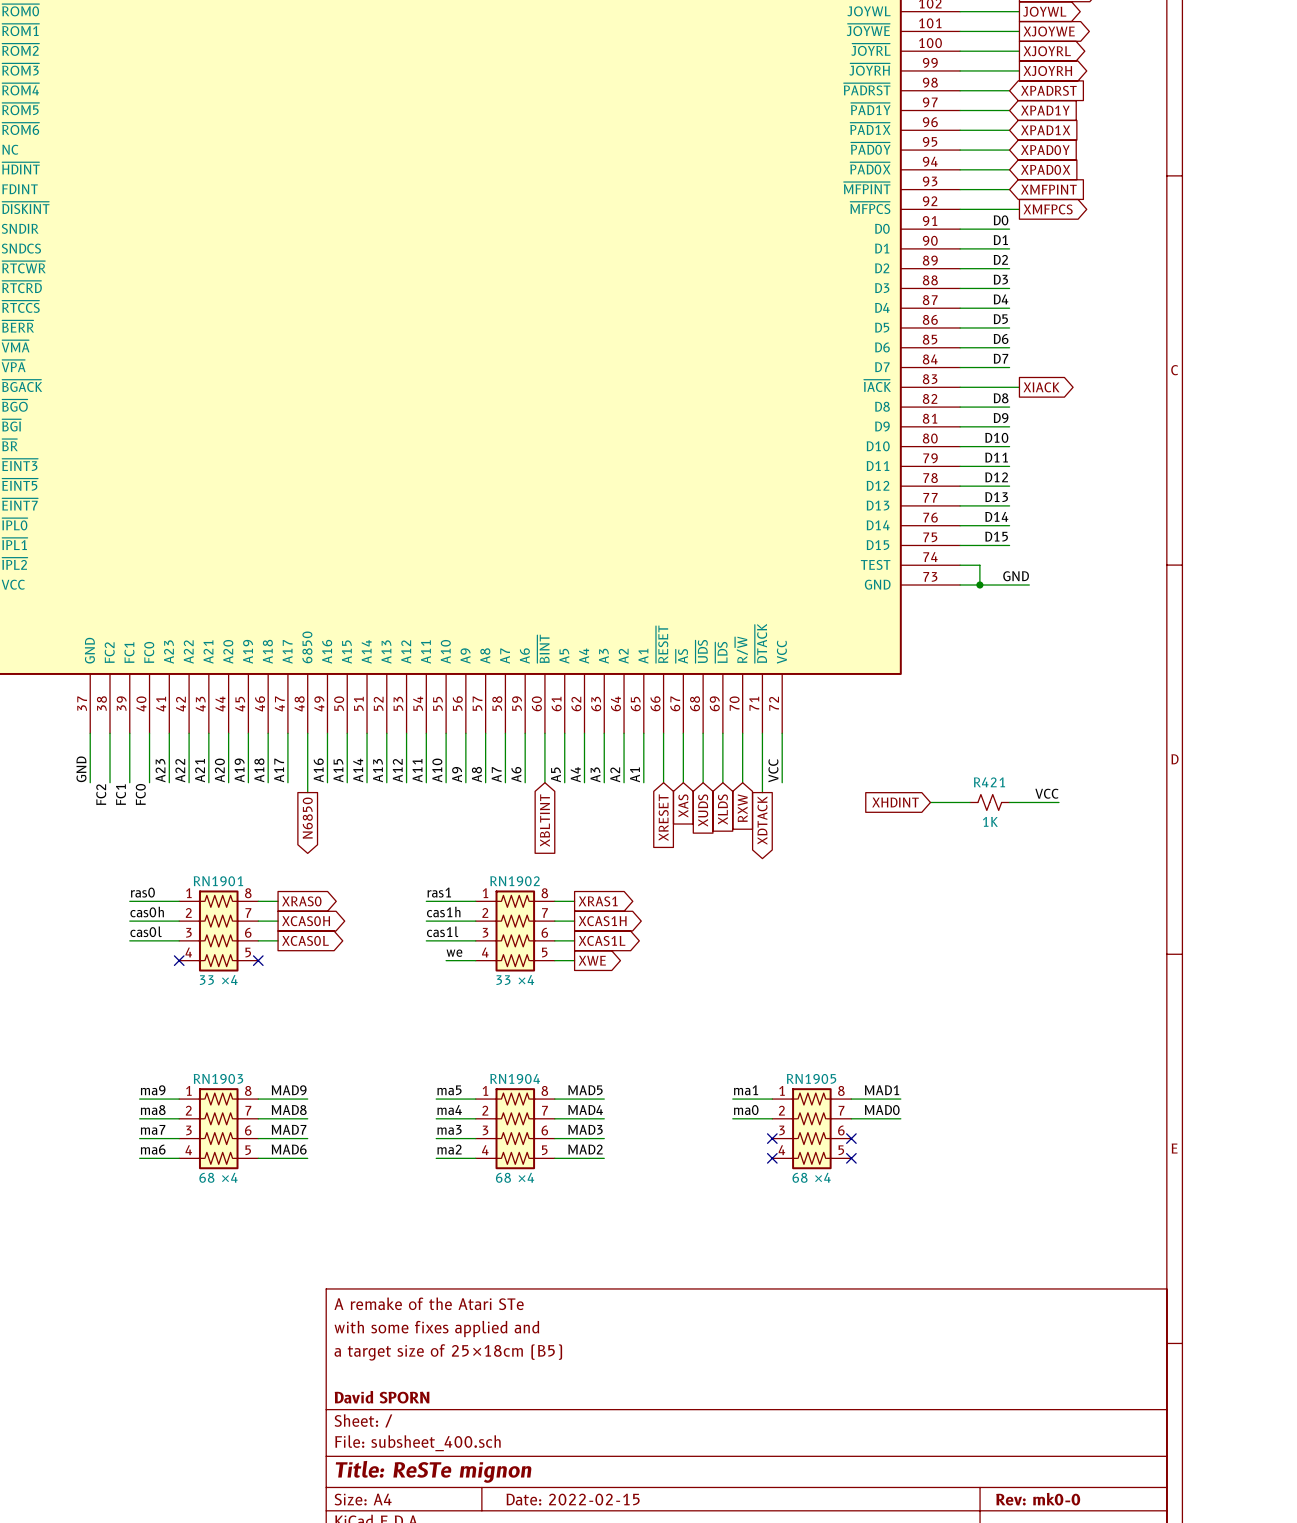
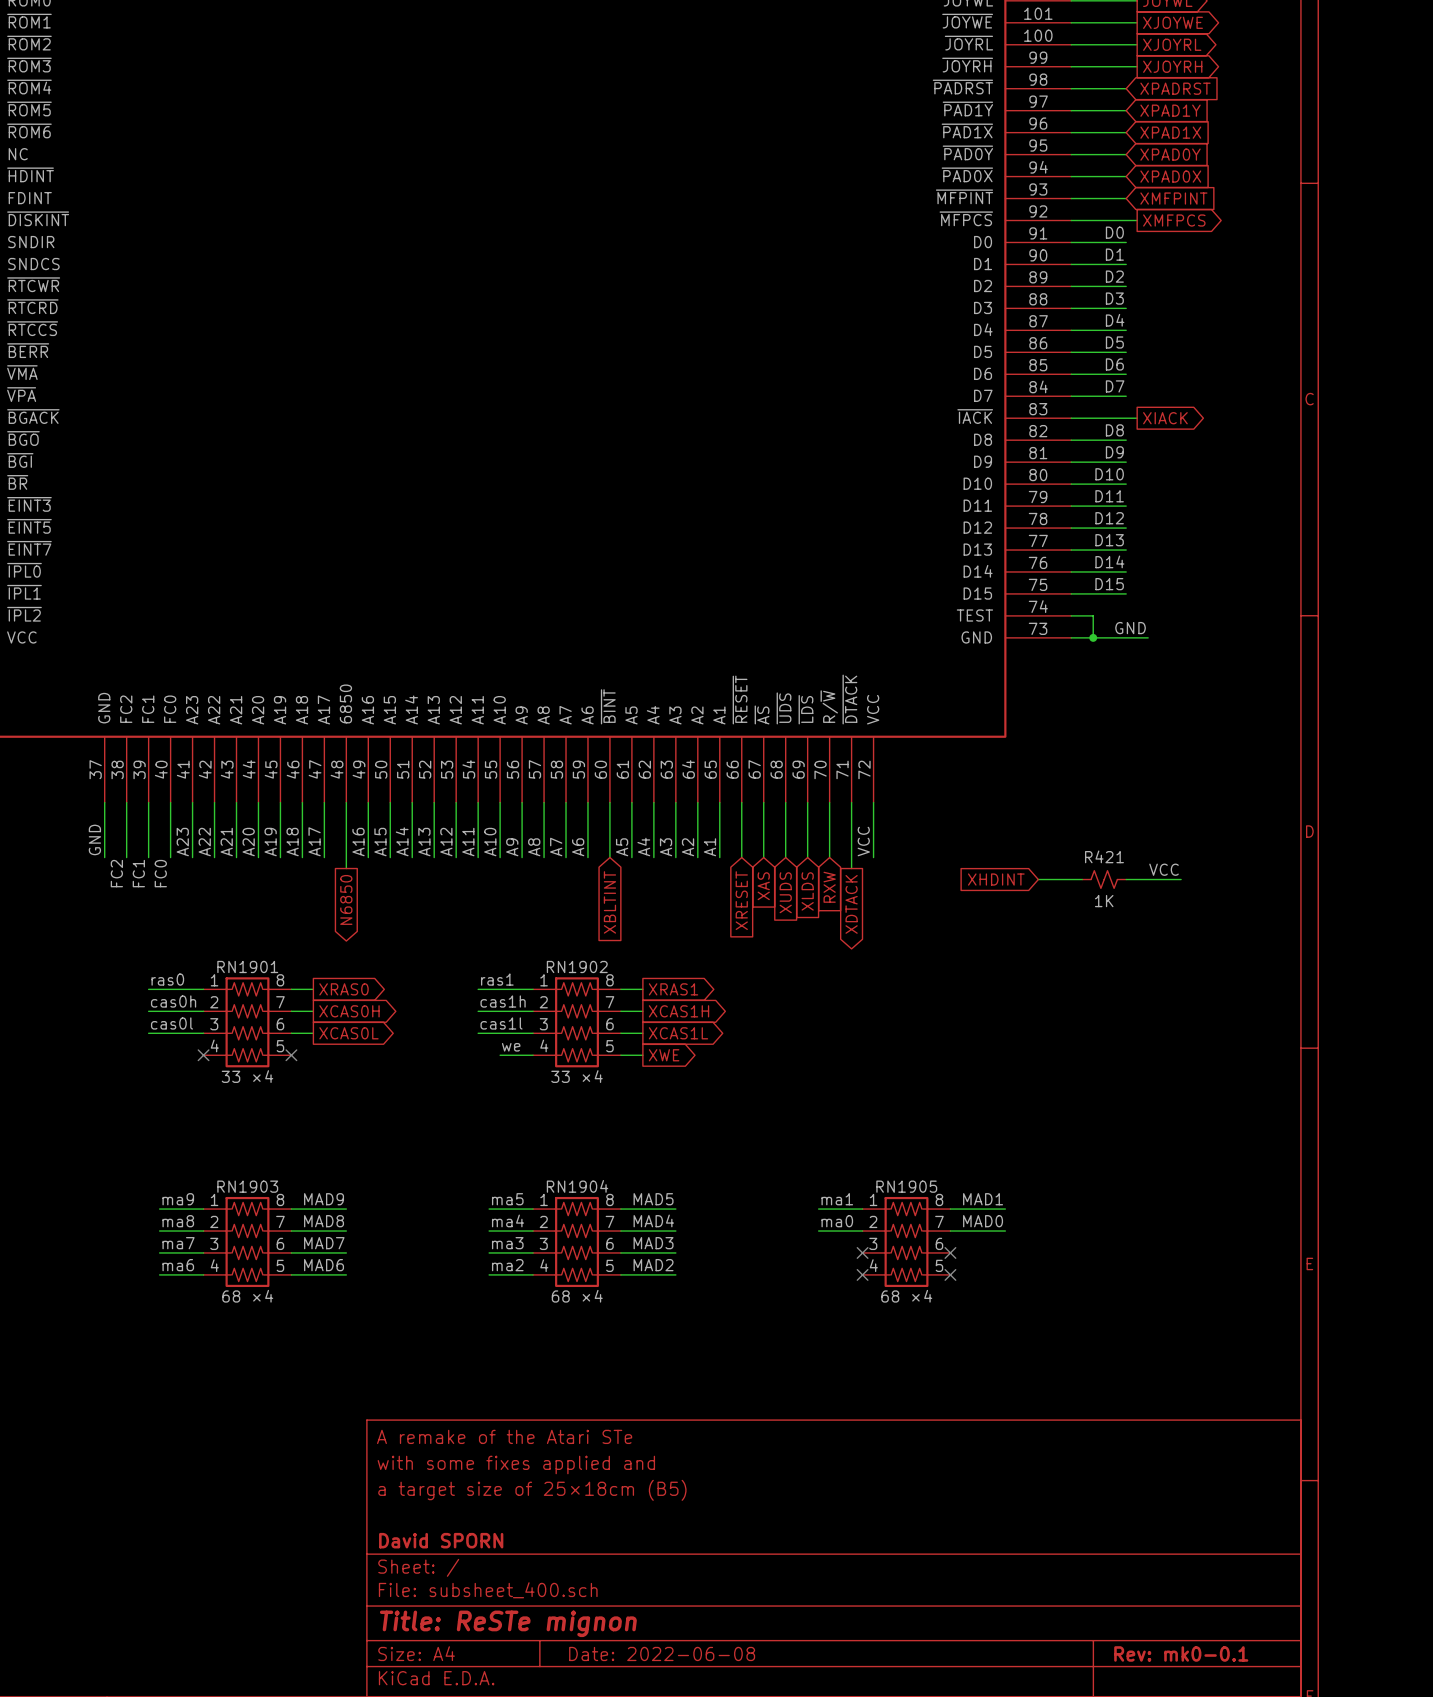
title block: Date: 2022-02-15 (573, 1499) -> Date: 2022-06-08 (662, 1653)
title block: Rev: mk0-0 (1038, 1499) -> Rev: mk0-0.1 (1181, 1653)

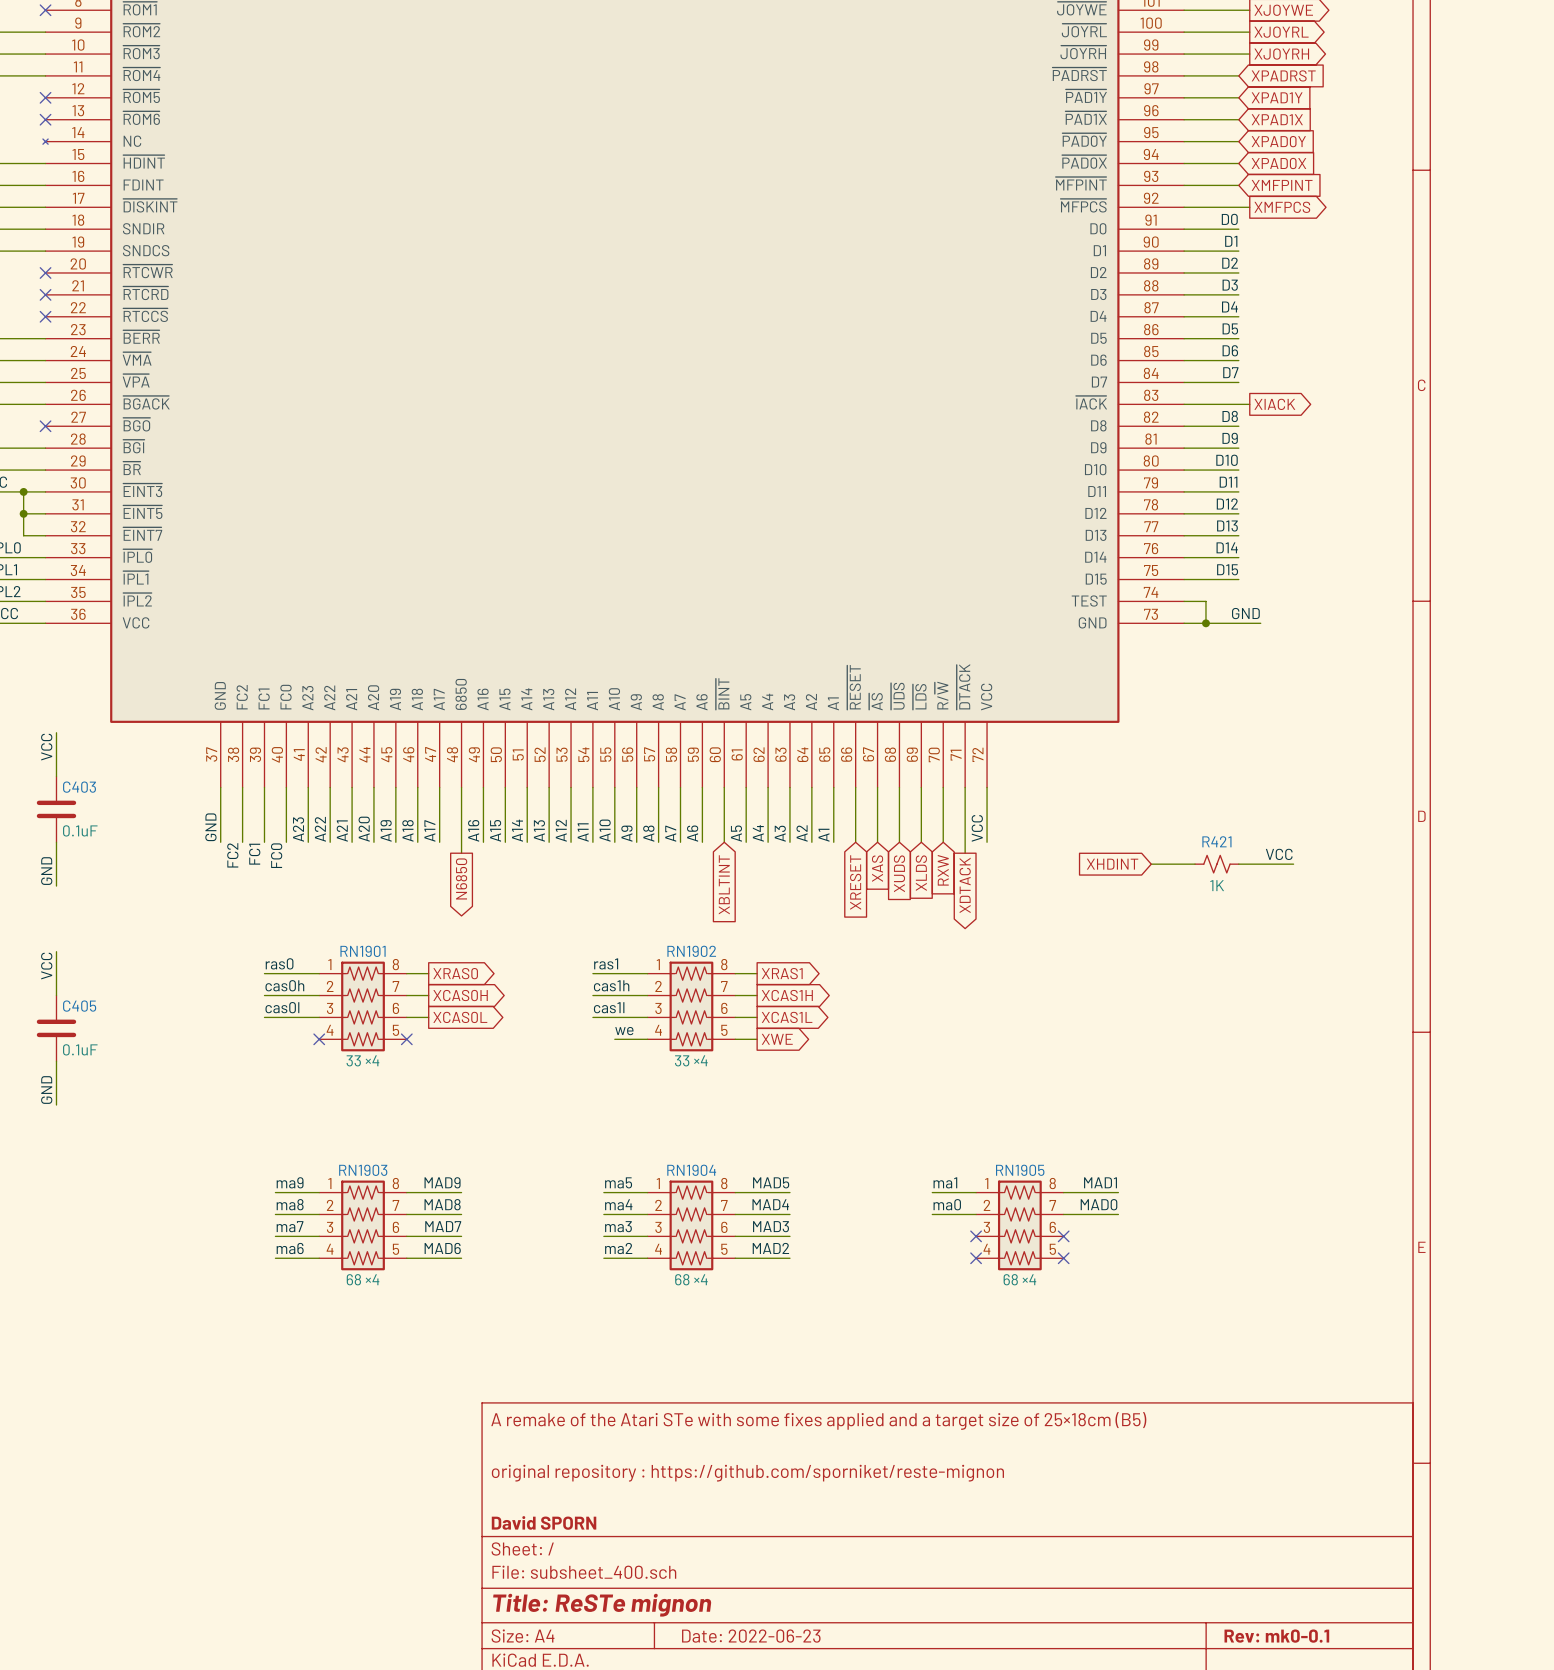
title block: A remake of the Atari STe (504, 1436) -> A remake of the Atari STe with some fixes applied and a target size of 25×18cm (B5) (818, 1420)
title block: with some fixes applied and (516, 1465) -> none
title block: a target size of 25×18cm (B5) (532, 1490) -> original repository : https://github.com/sporniket/reste-mignon (747, 1473)
title block: Date: 2022-06-08 (662, 1653) -> Date: 2022-06-23 (751, 1636)

